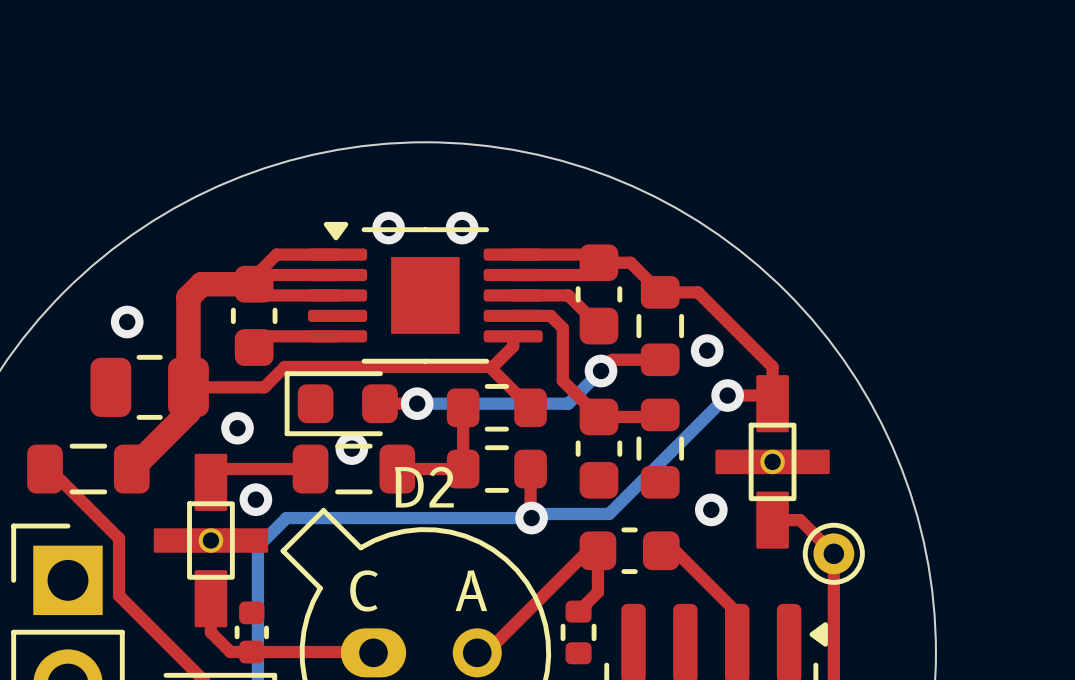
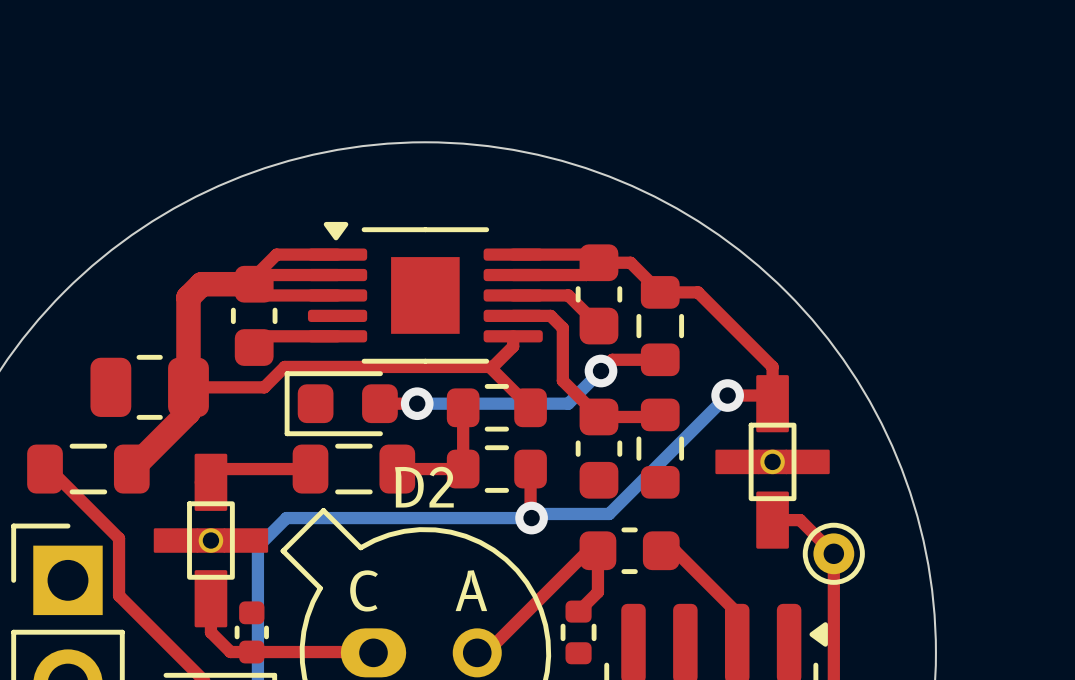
via: (388, 228) -> none
via: (462, 228) -> none
via: (127, 322) -> none
via: (707, 350) -> none
via: (237, 428) -> none
via: (351, 448) -> none
via: (255, 499) -> none
via: (711, 509) -> none

